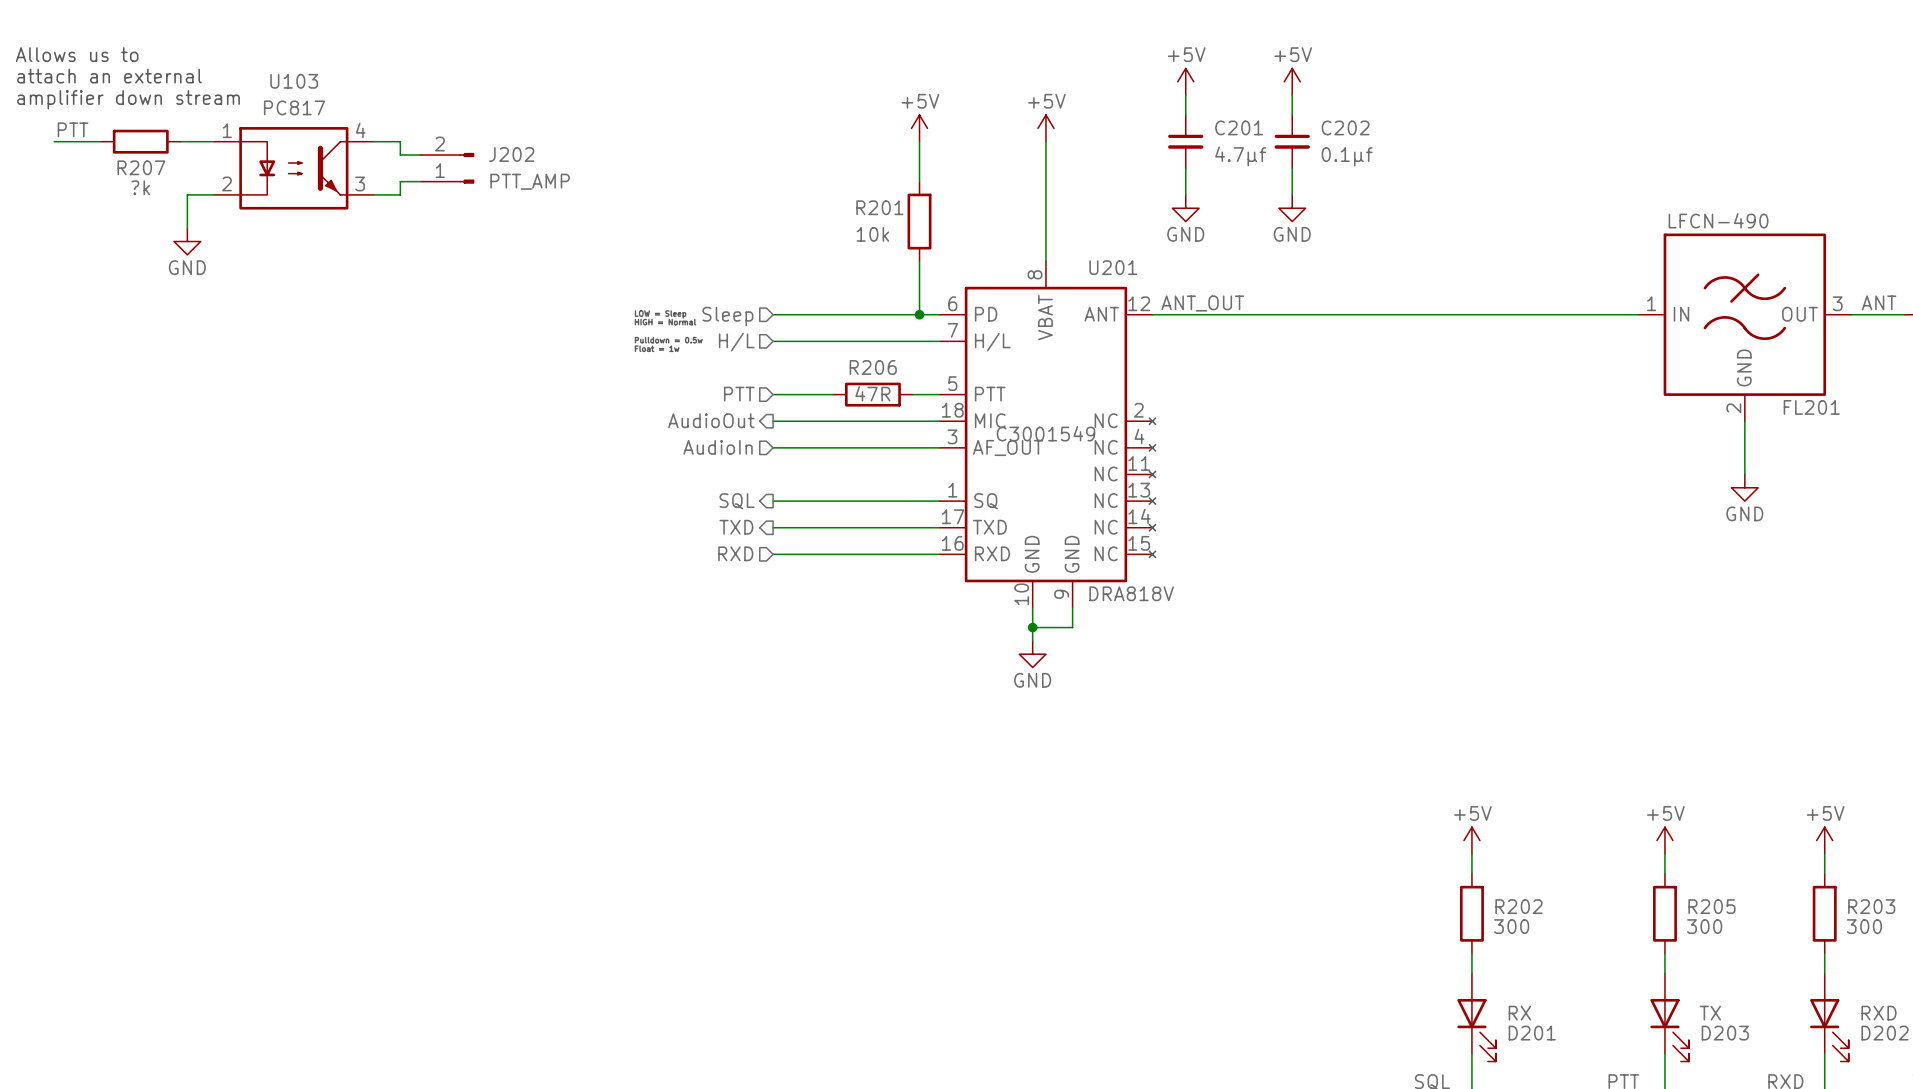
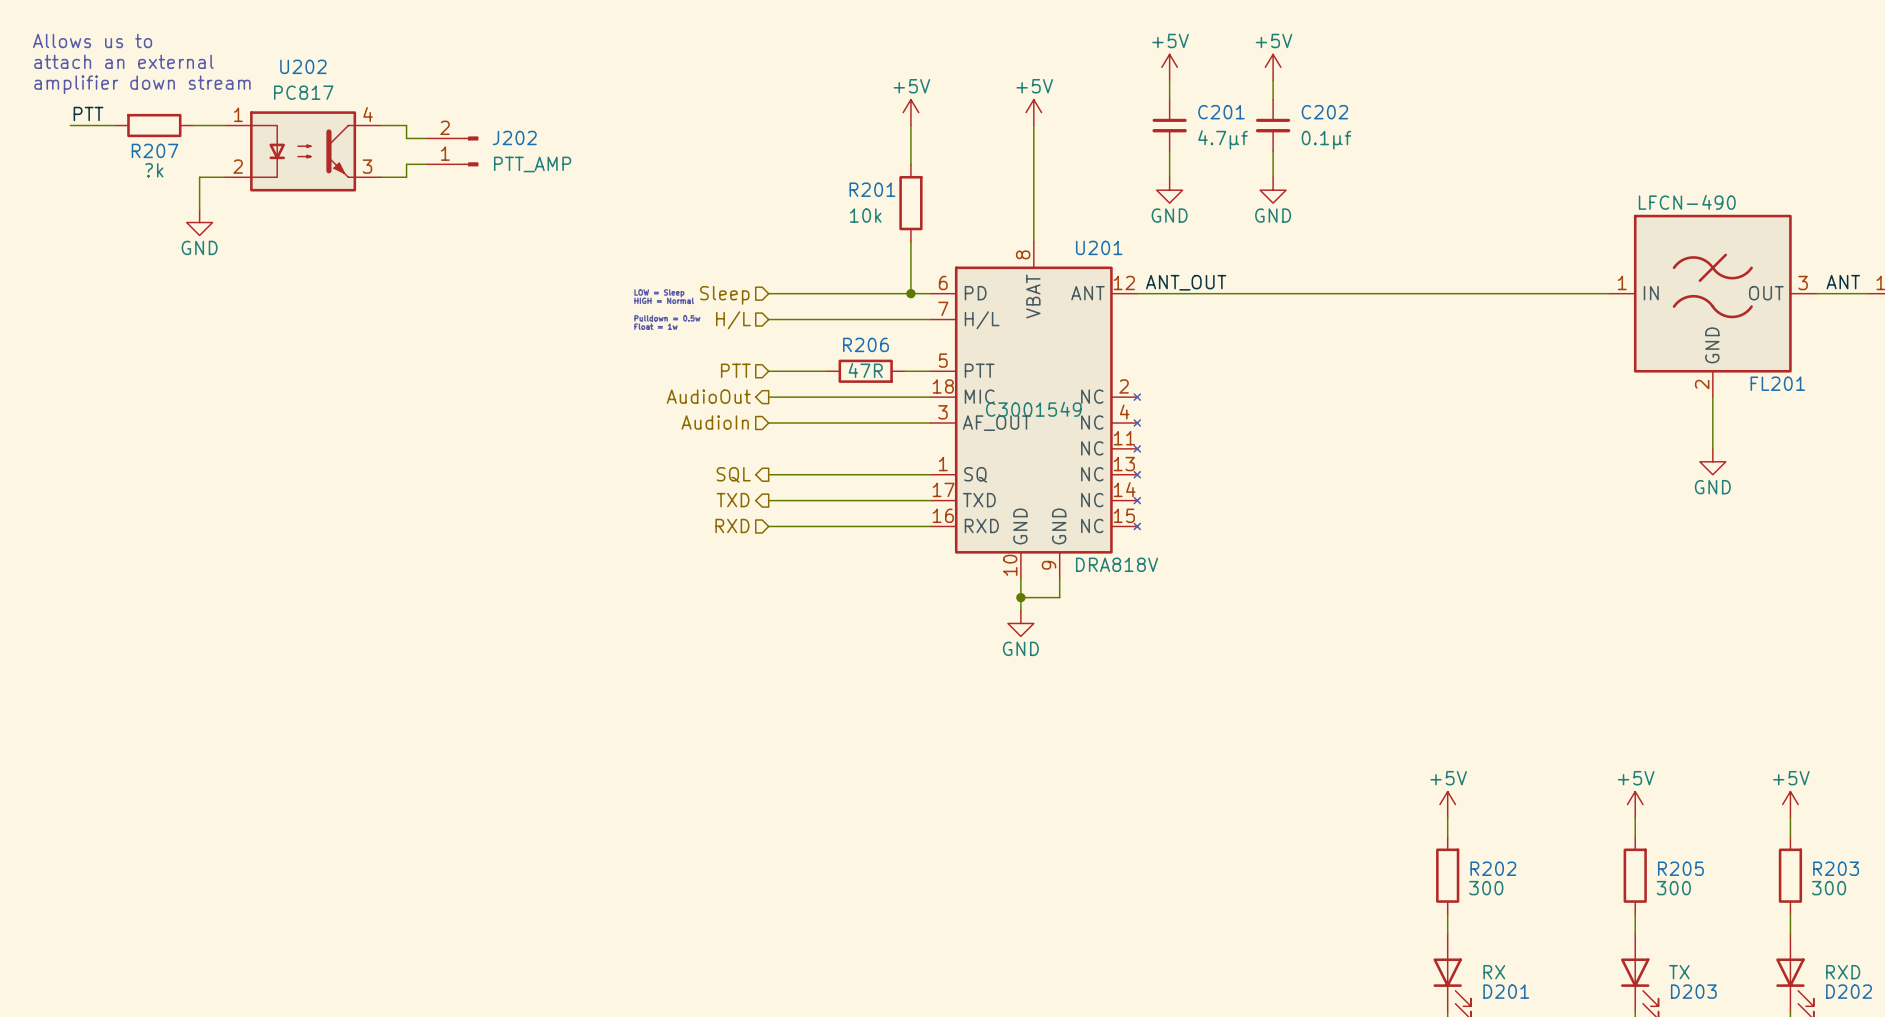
U103 name: U103 (294, 81) -> U202 (303, 66)

